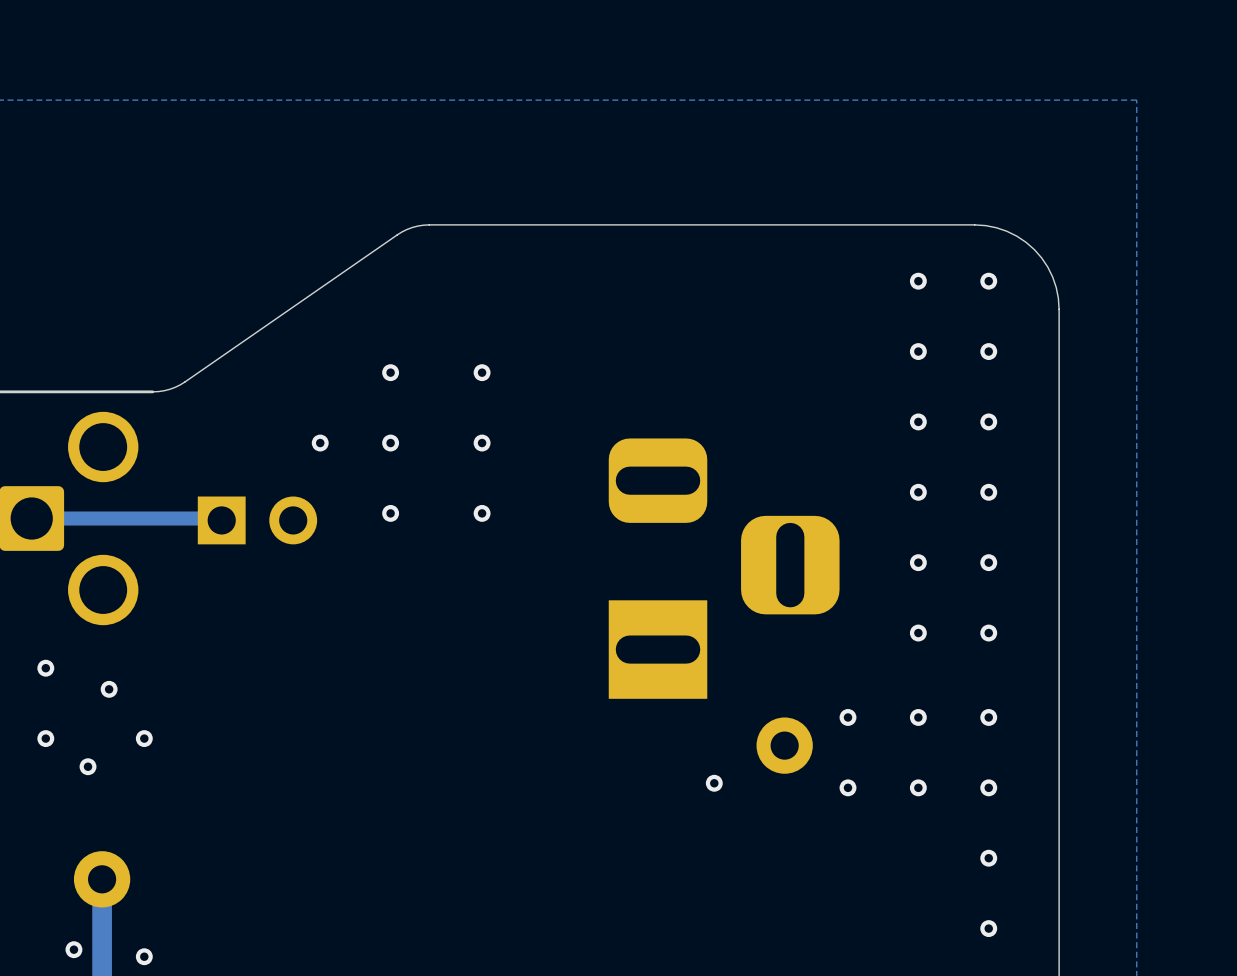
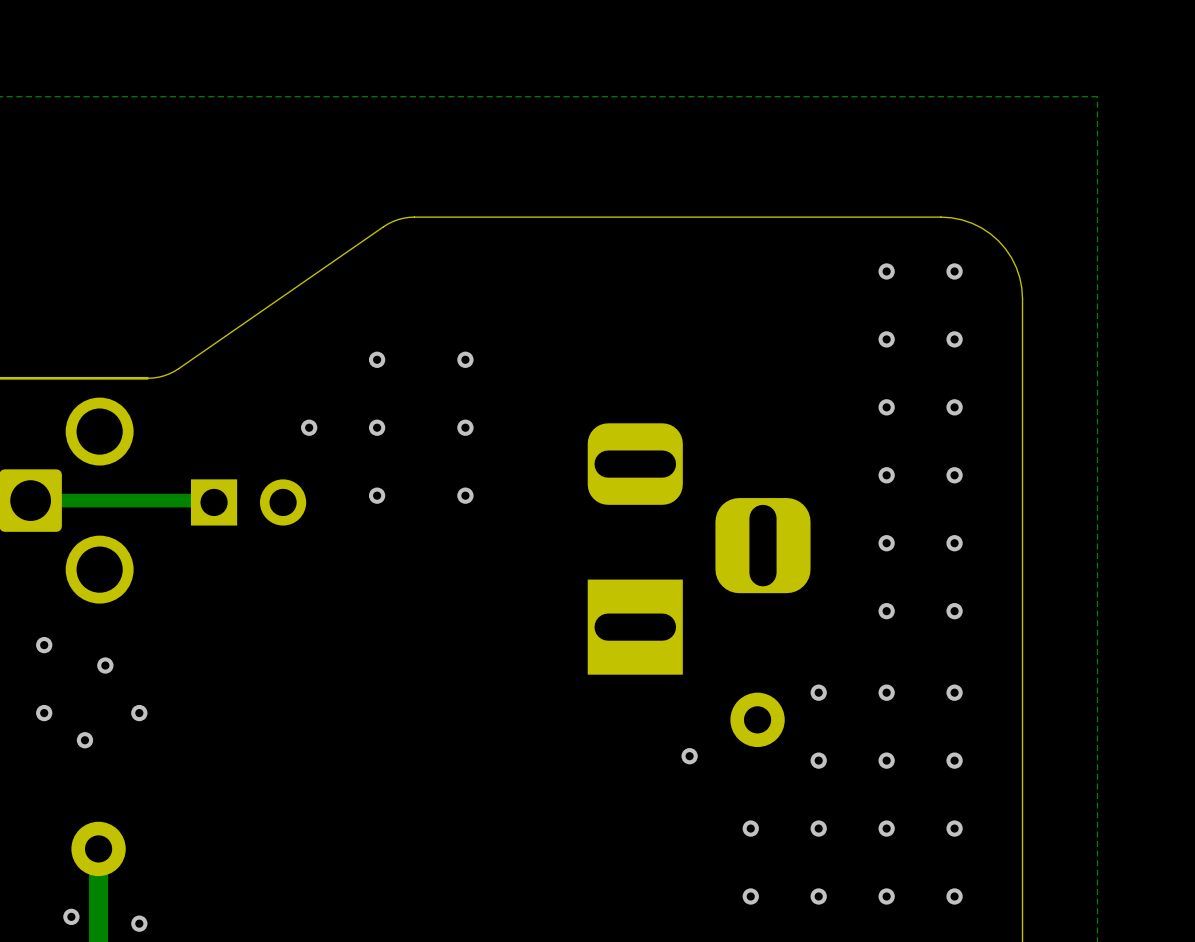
via: none -> (750, 828)
via: none -> (818, 828)
via: none -> (886, 828)
via: none -> (750, 896)
via: none -> (818, 896)
via: none -> (886, 896)

